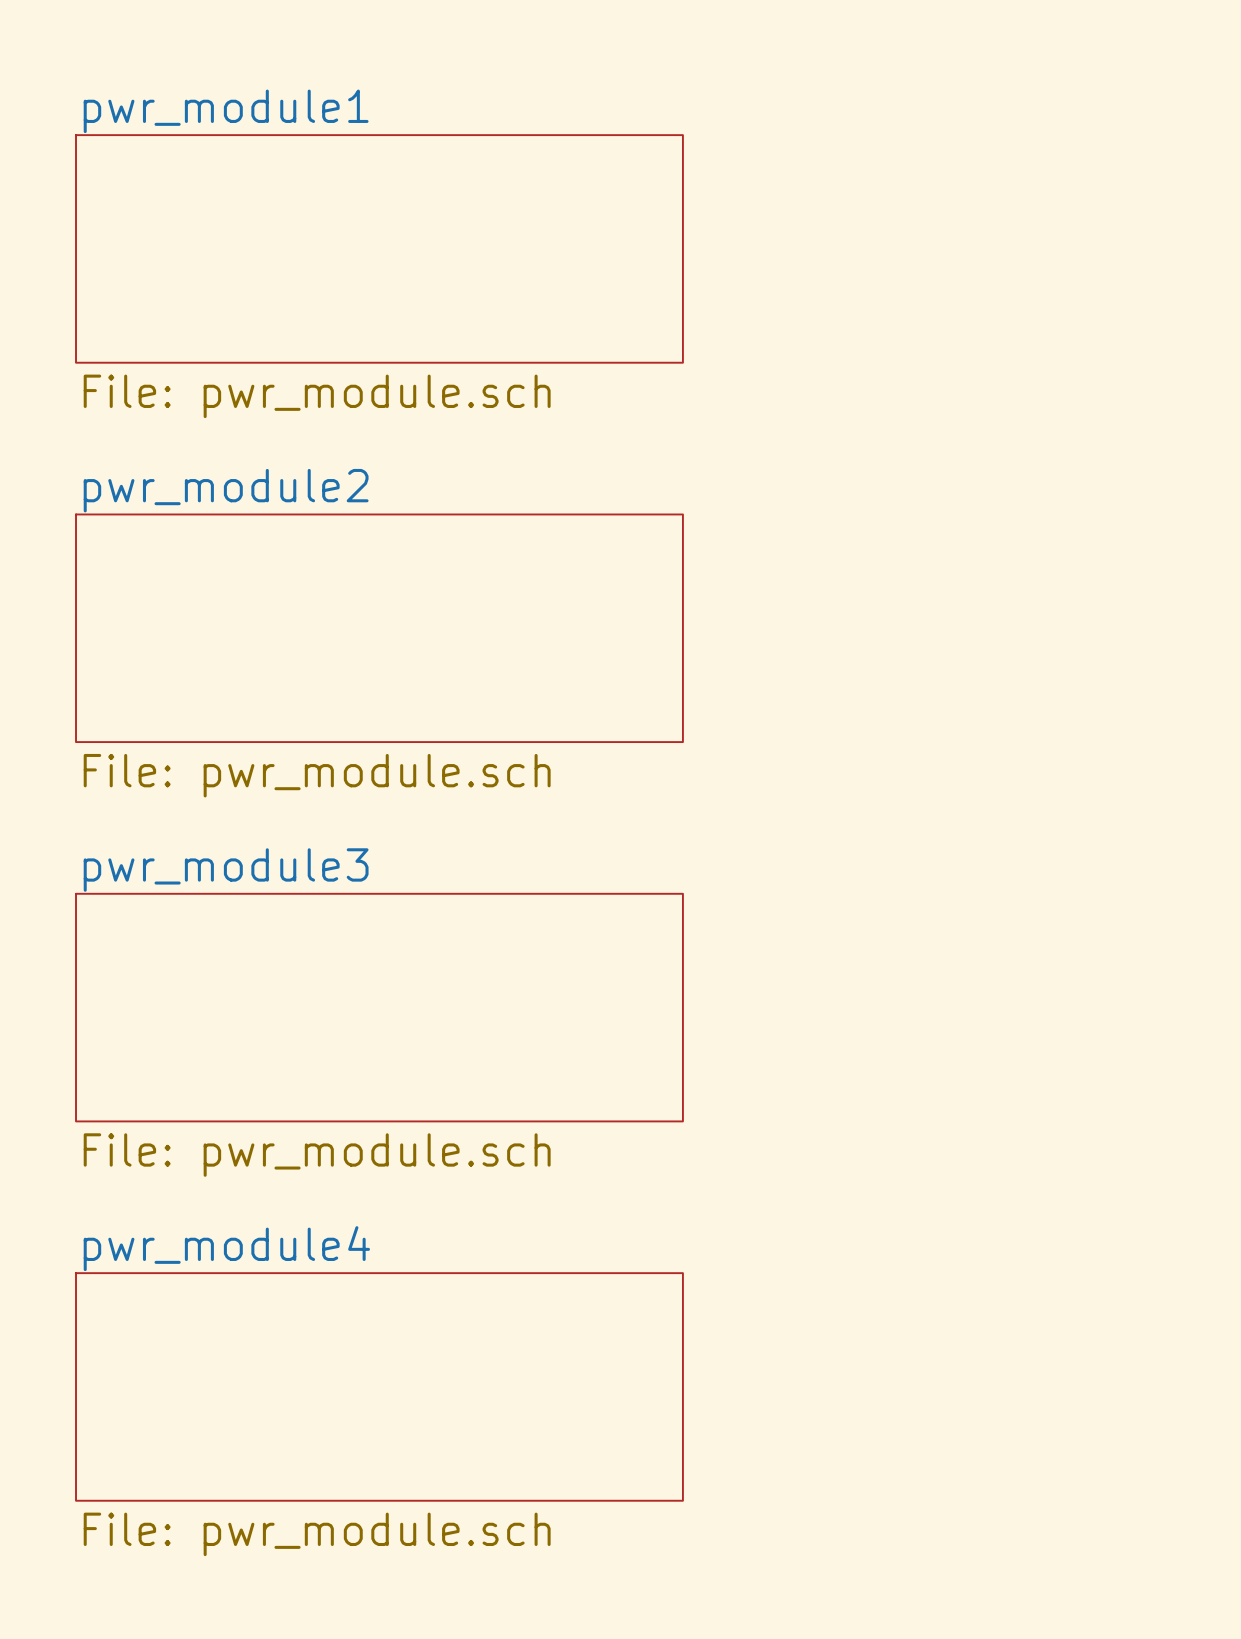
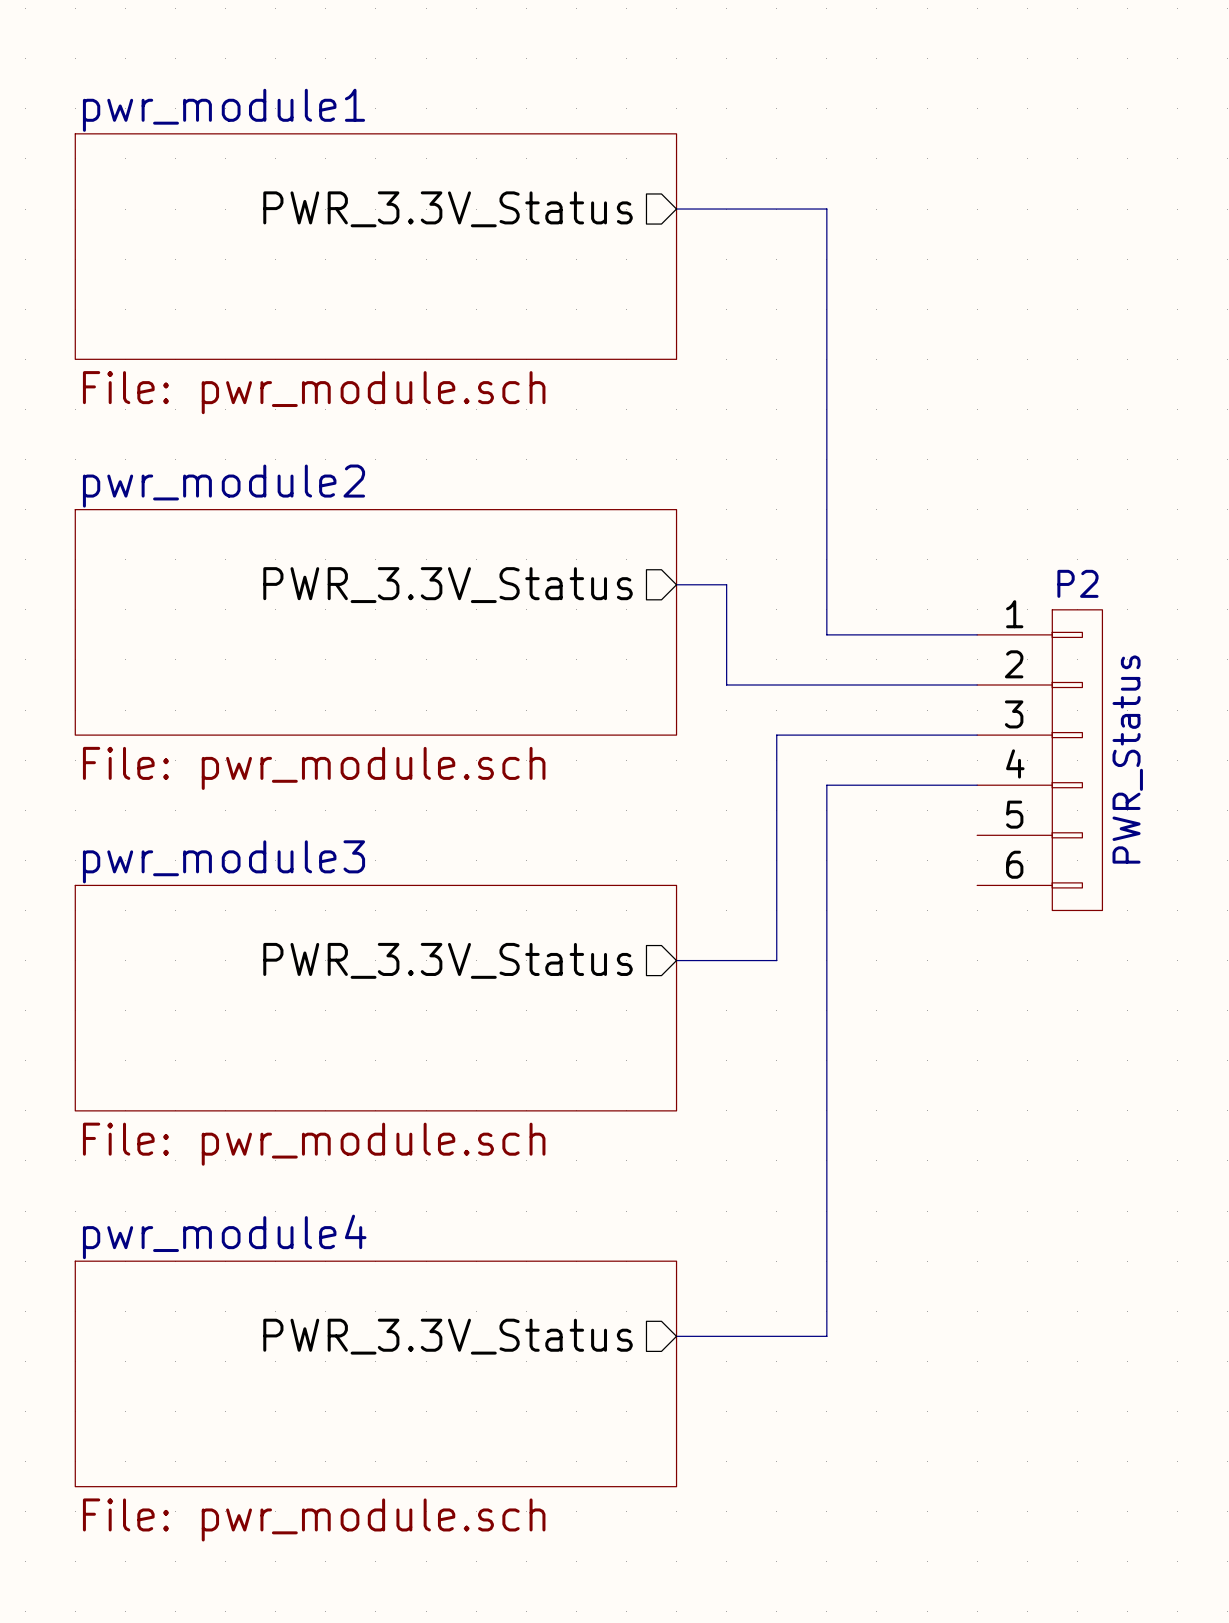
wire: none -> (676, 209) (826, 209) (826, 634) (977, 634)
sheet pin: none -> PWR_3.3V_Status (448, 209)
sheet pin: none -> PWR_3.3V_Status (448, 585)
wire: none -> (676, 584) (726, 584) (726, 684) (977, 684)
wire: none -> (977, 735) (776, 735) (776, 960) (676, 960)
P2: none -> PWR_Status (1039, 760)
wire: none -> (977, 785) (826, 785) (826, 1336) (676, 1336)
sheet pin: none -> PWR_3.3V_Status (448, 960)
sheet pin: none -> PWR_3.3V_Status (448, 1336)

